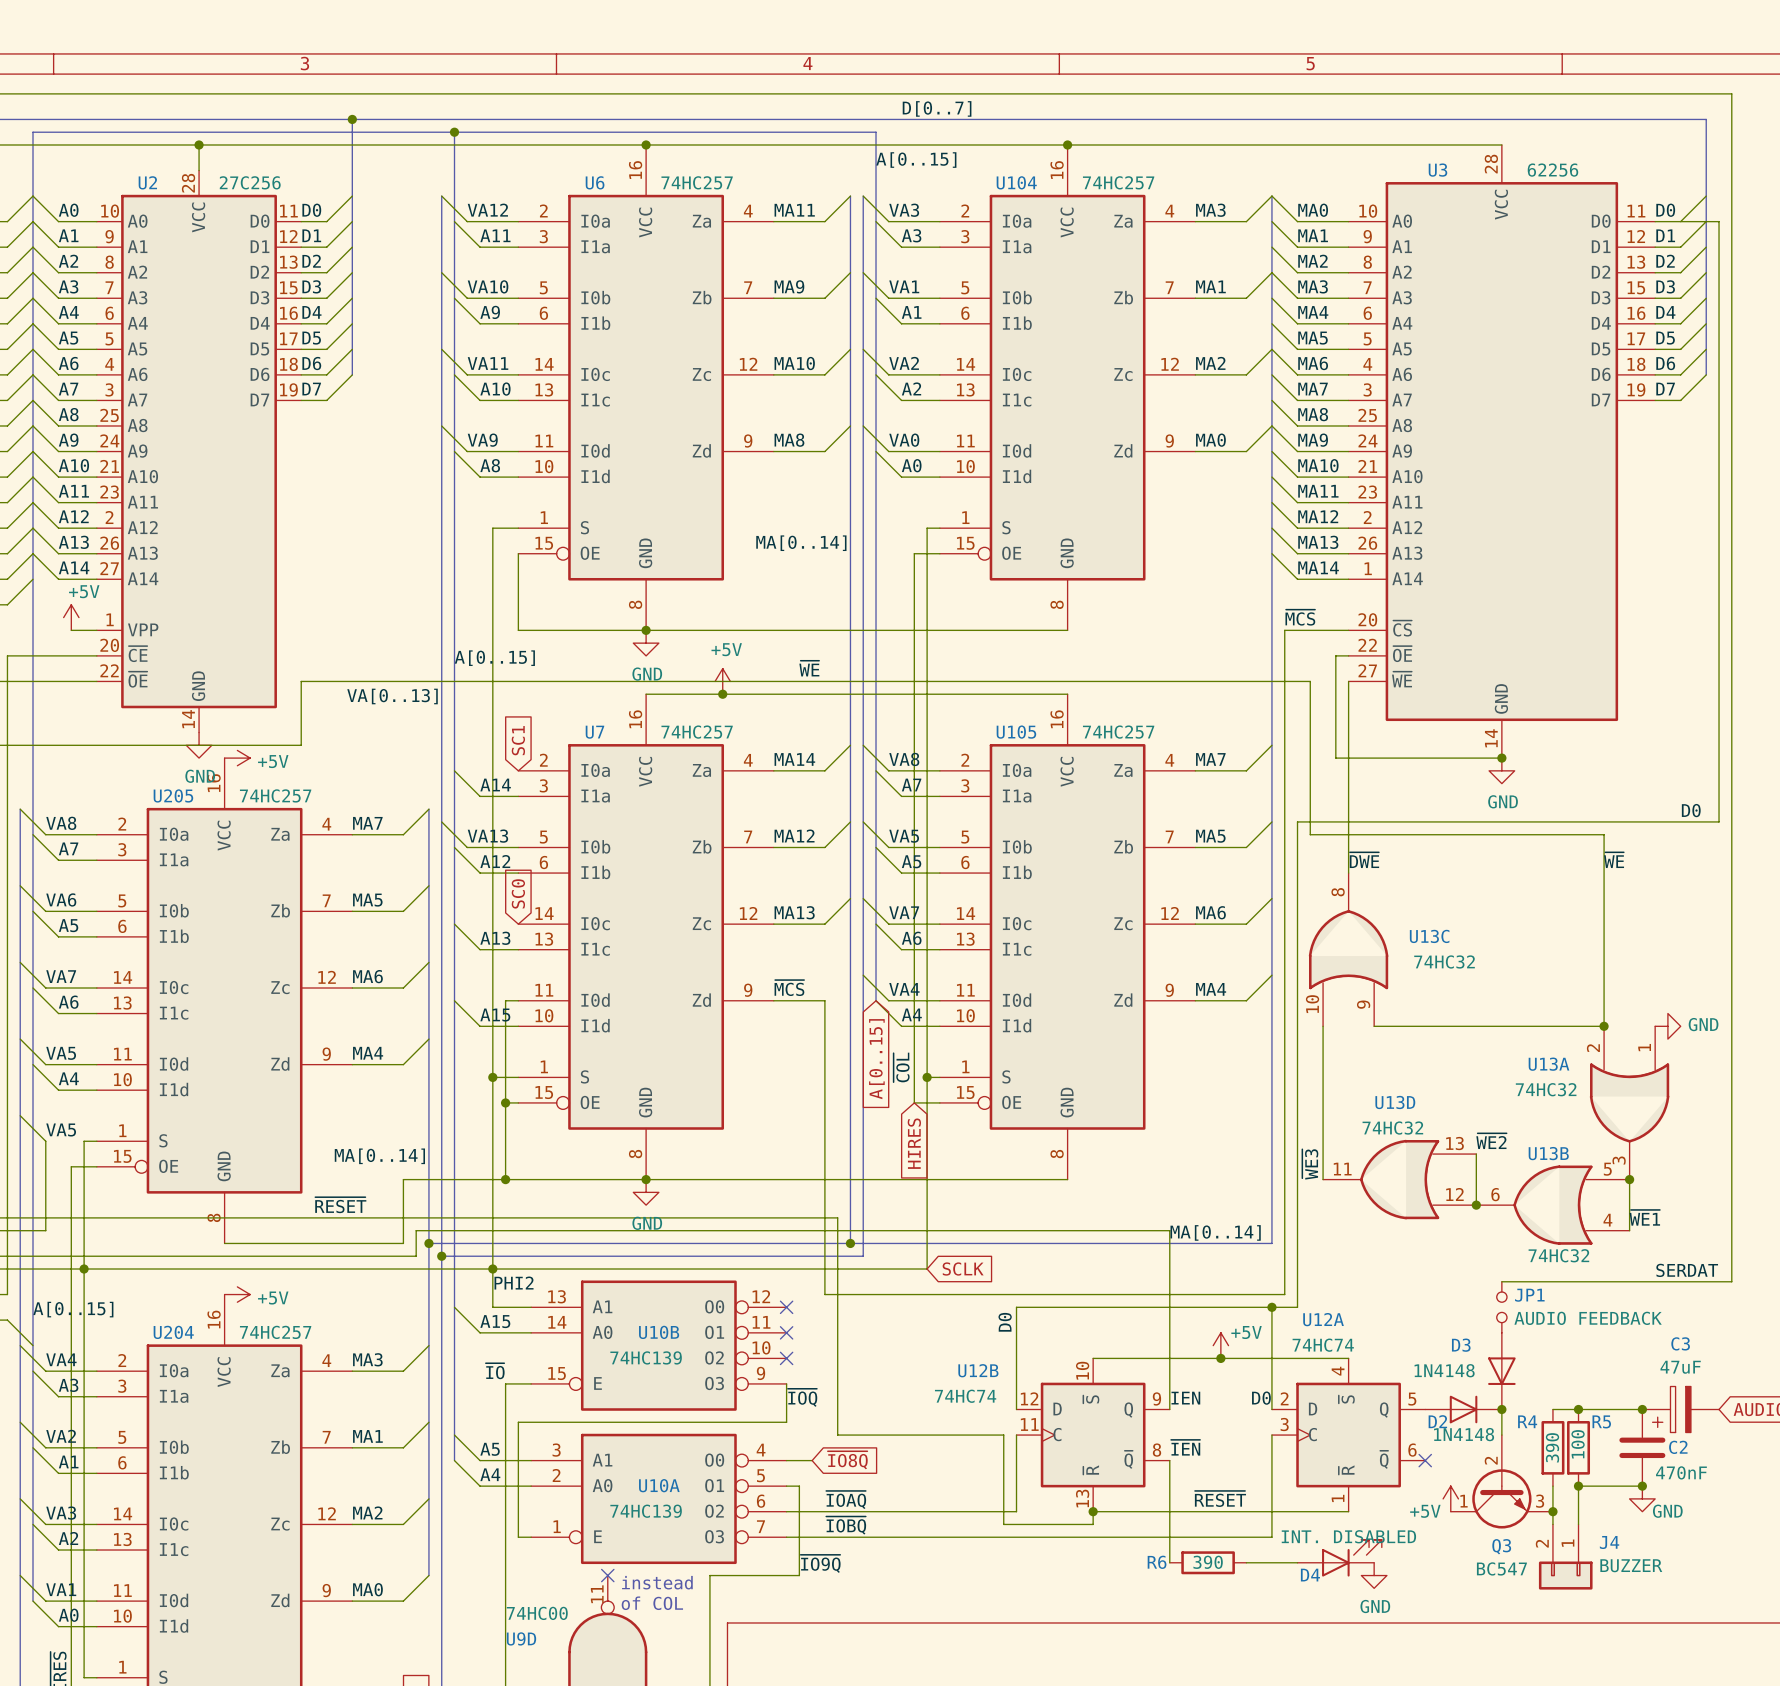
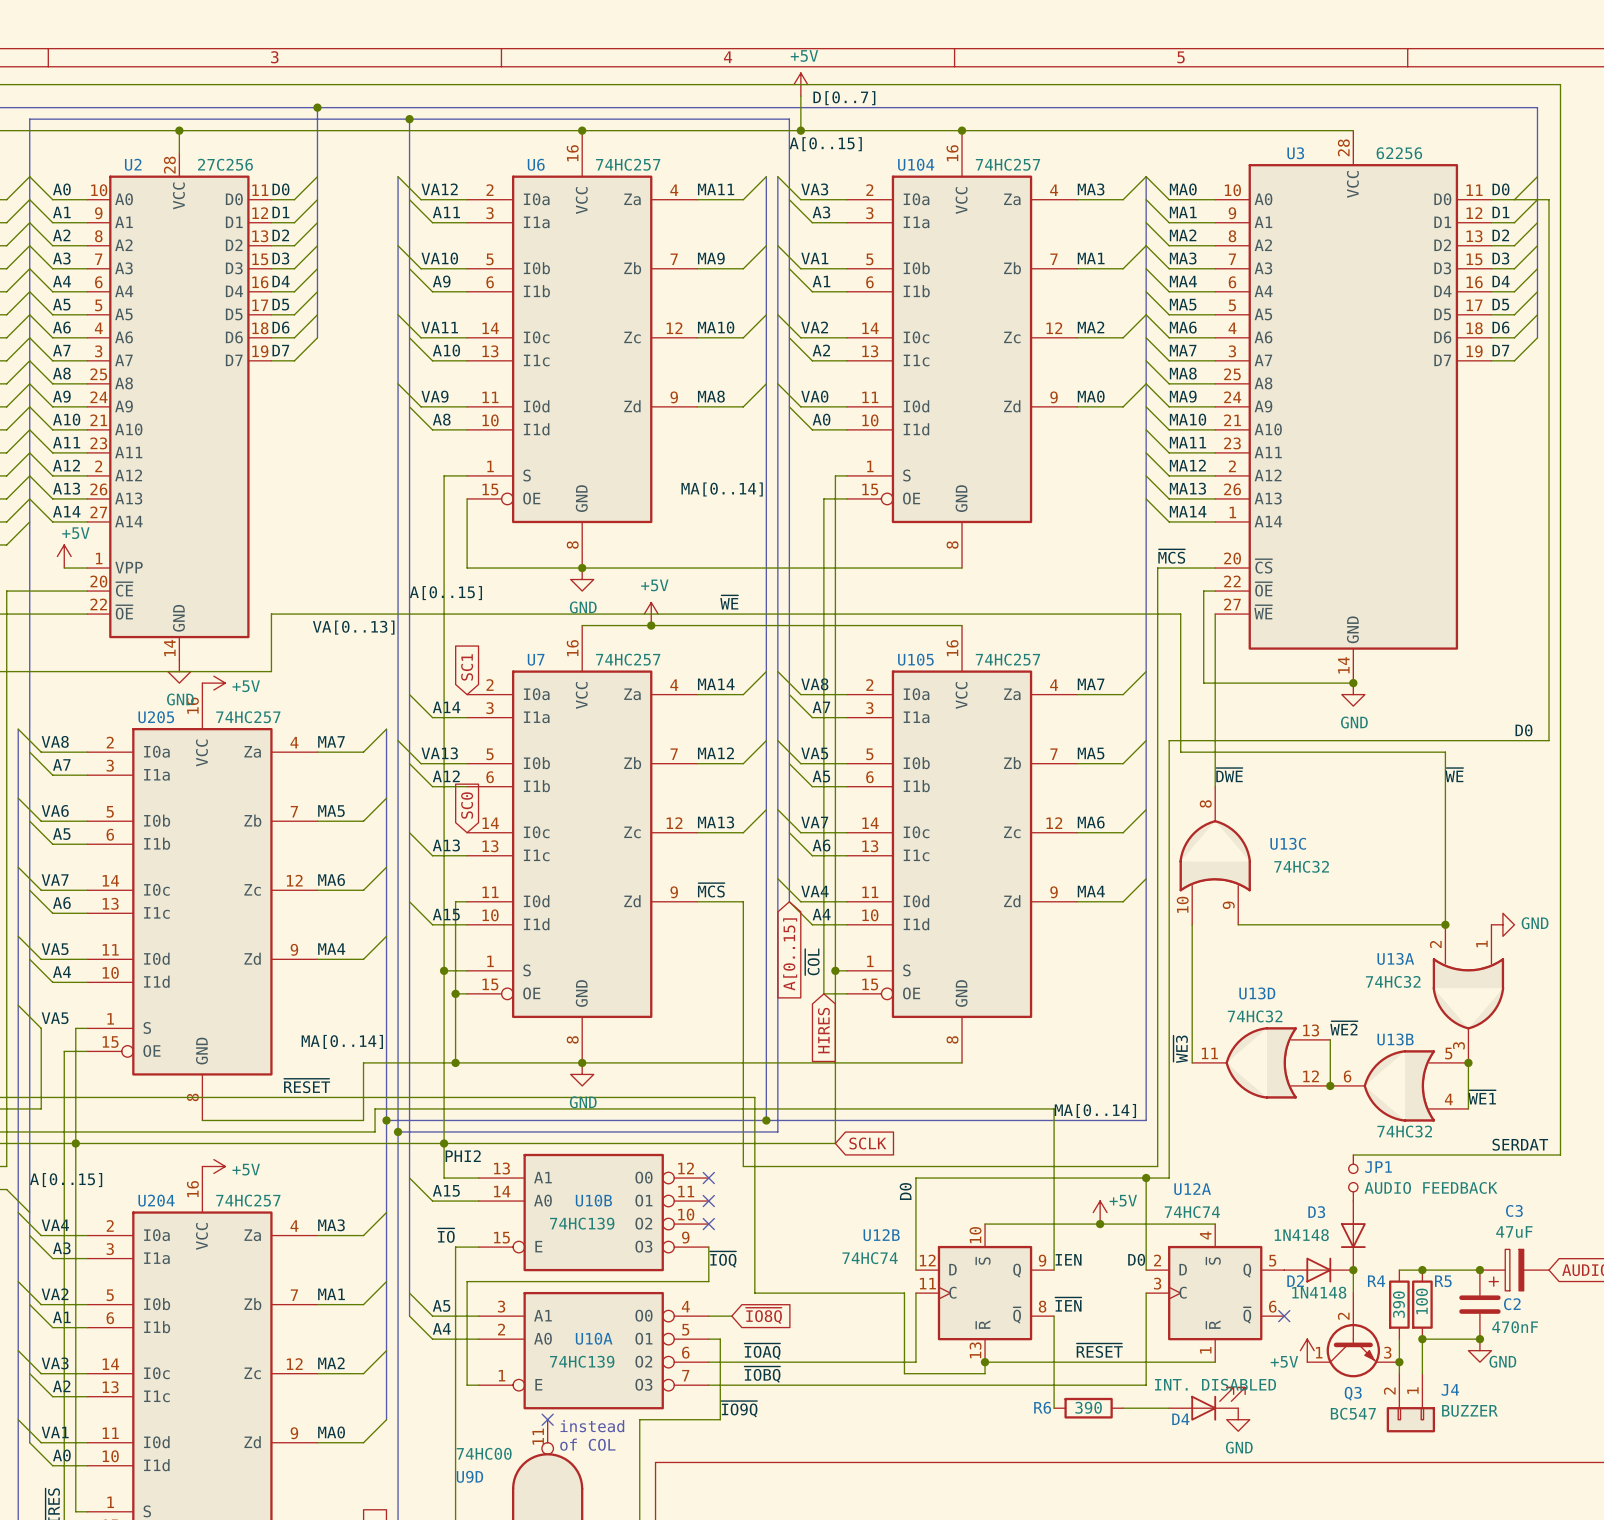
power symbol: none -> +5V (800, 84)
wire: none -> (800, 96) (800, 130)
junction: none -> (800, 130)

